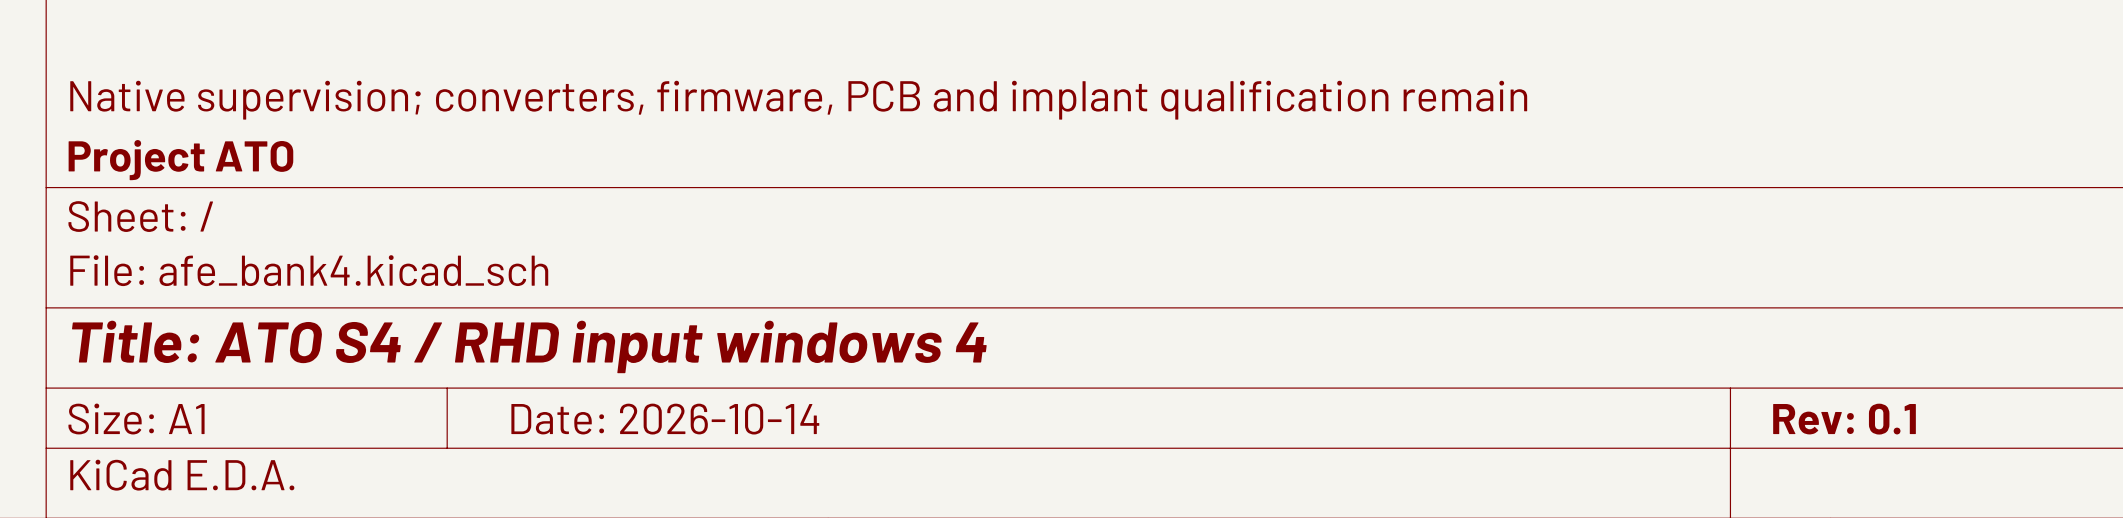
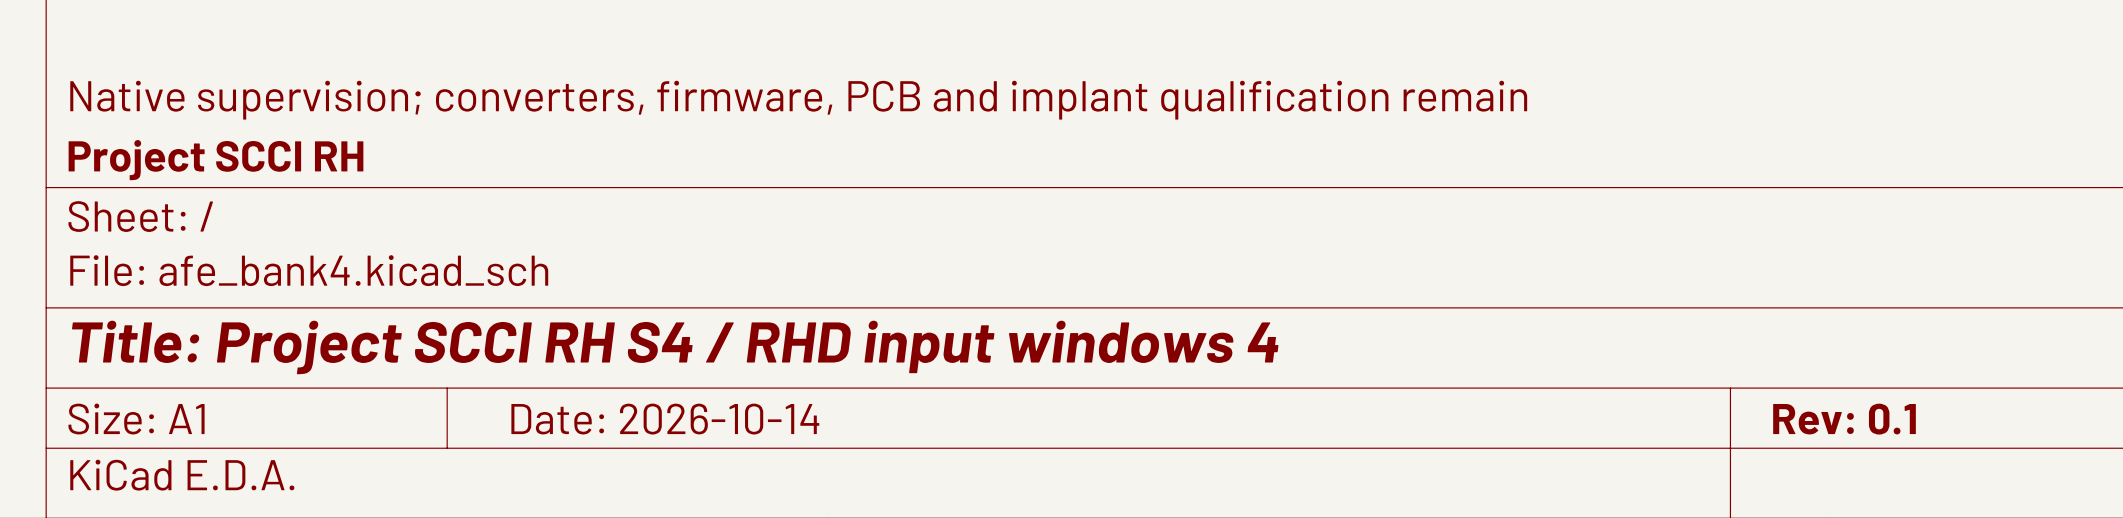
title block: Project ATO (180, 160) -> Project SCCI RH (216, 160)
title block: Title: ATO S4 / RHD input windows 4 (529, 346) -> Title: Project SCCI RH S4 / RHD input windows 4 (675, 347)

